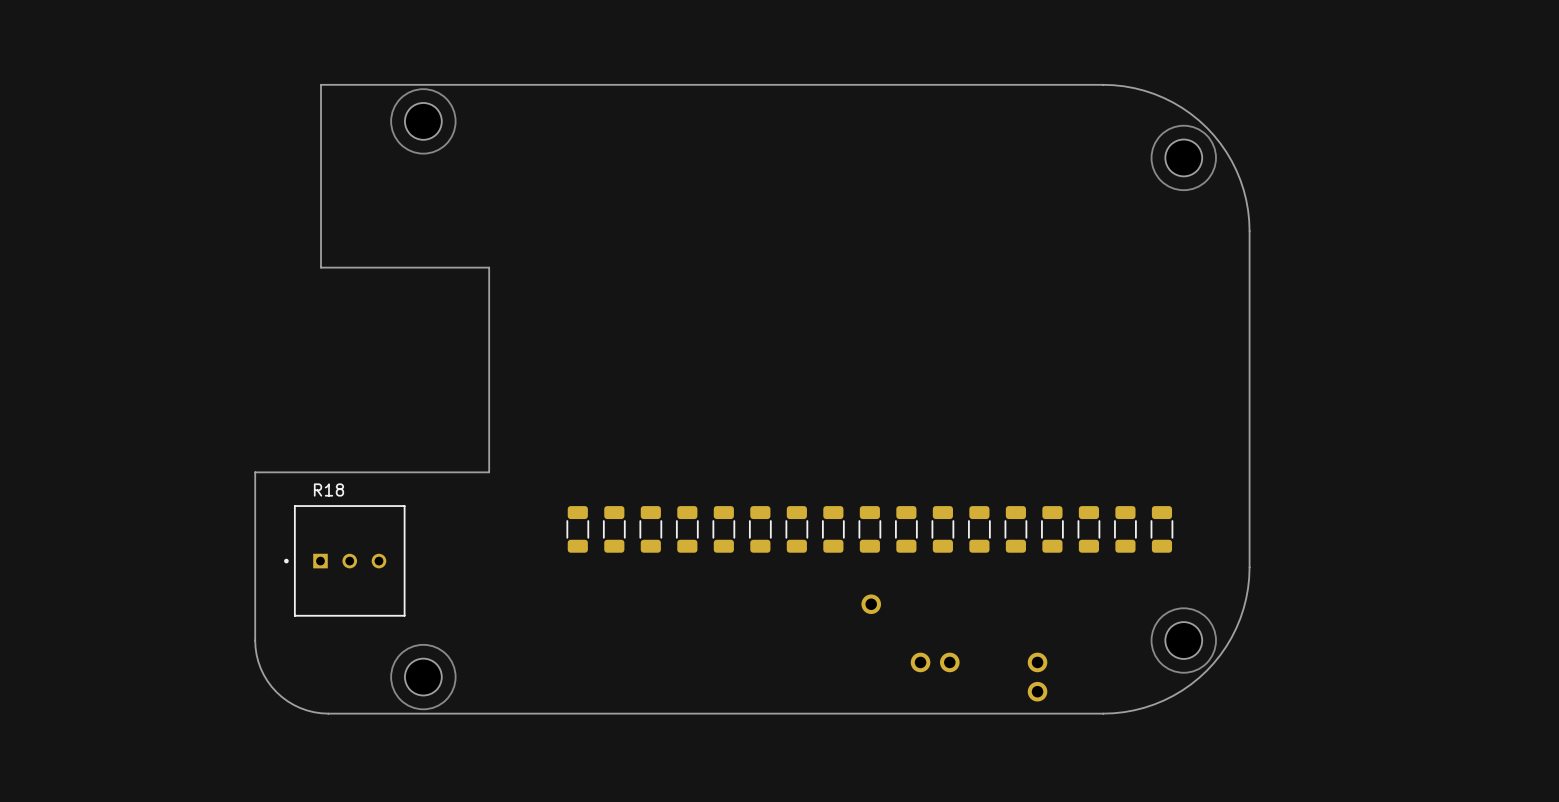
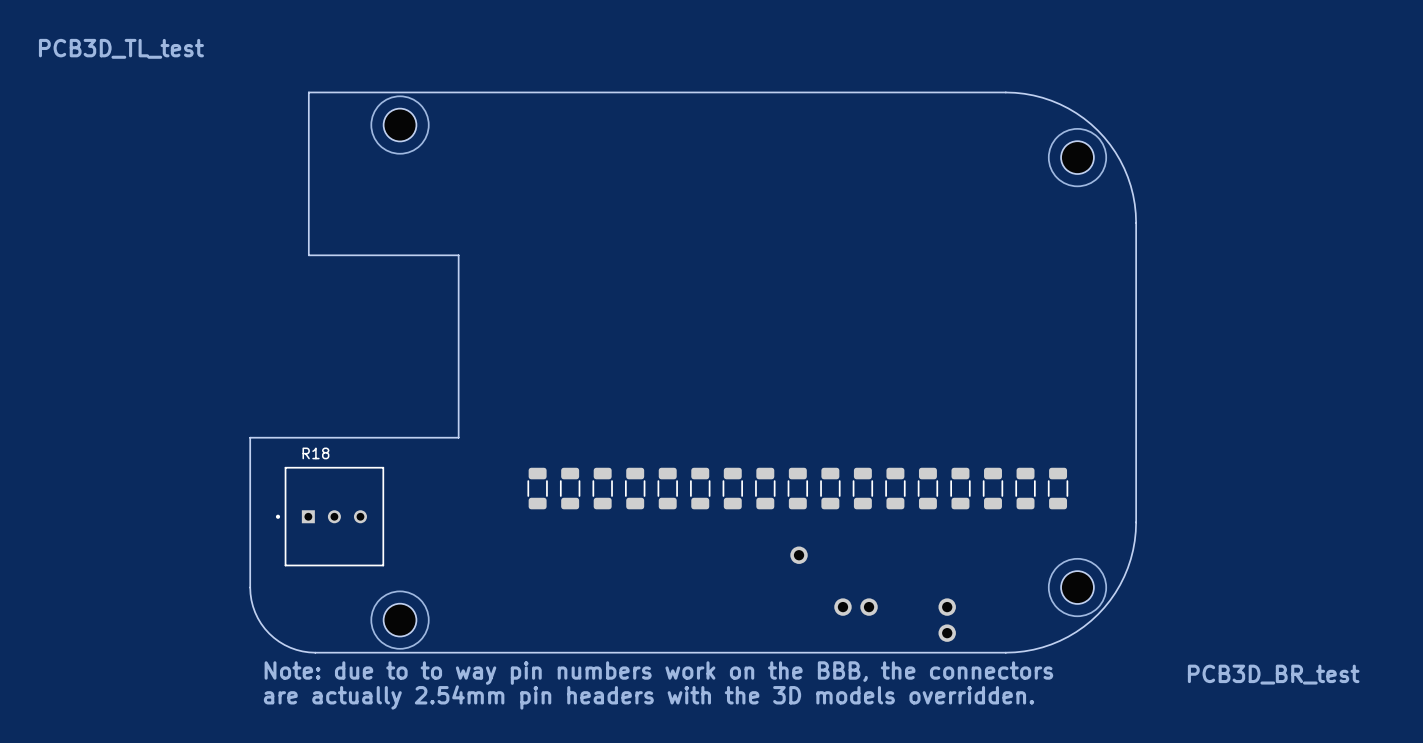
text: none -> PCB3D_TL_test (121, 48)
text: none -> Note: due to to way pin numbers work on the BBB, the connectors (658, 673)
text: none -> PCB3D_BR_test (1273, 674)
text: none -> are actually 2.54mm pin headers with the 3D models overridden. (649, 697)

